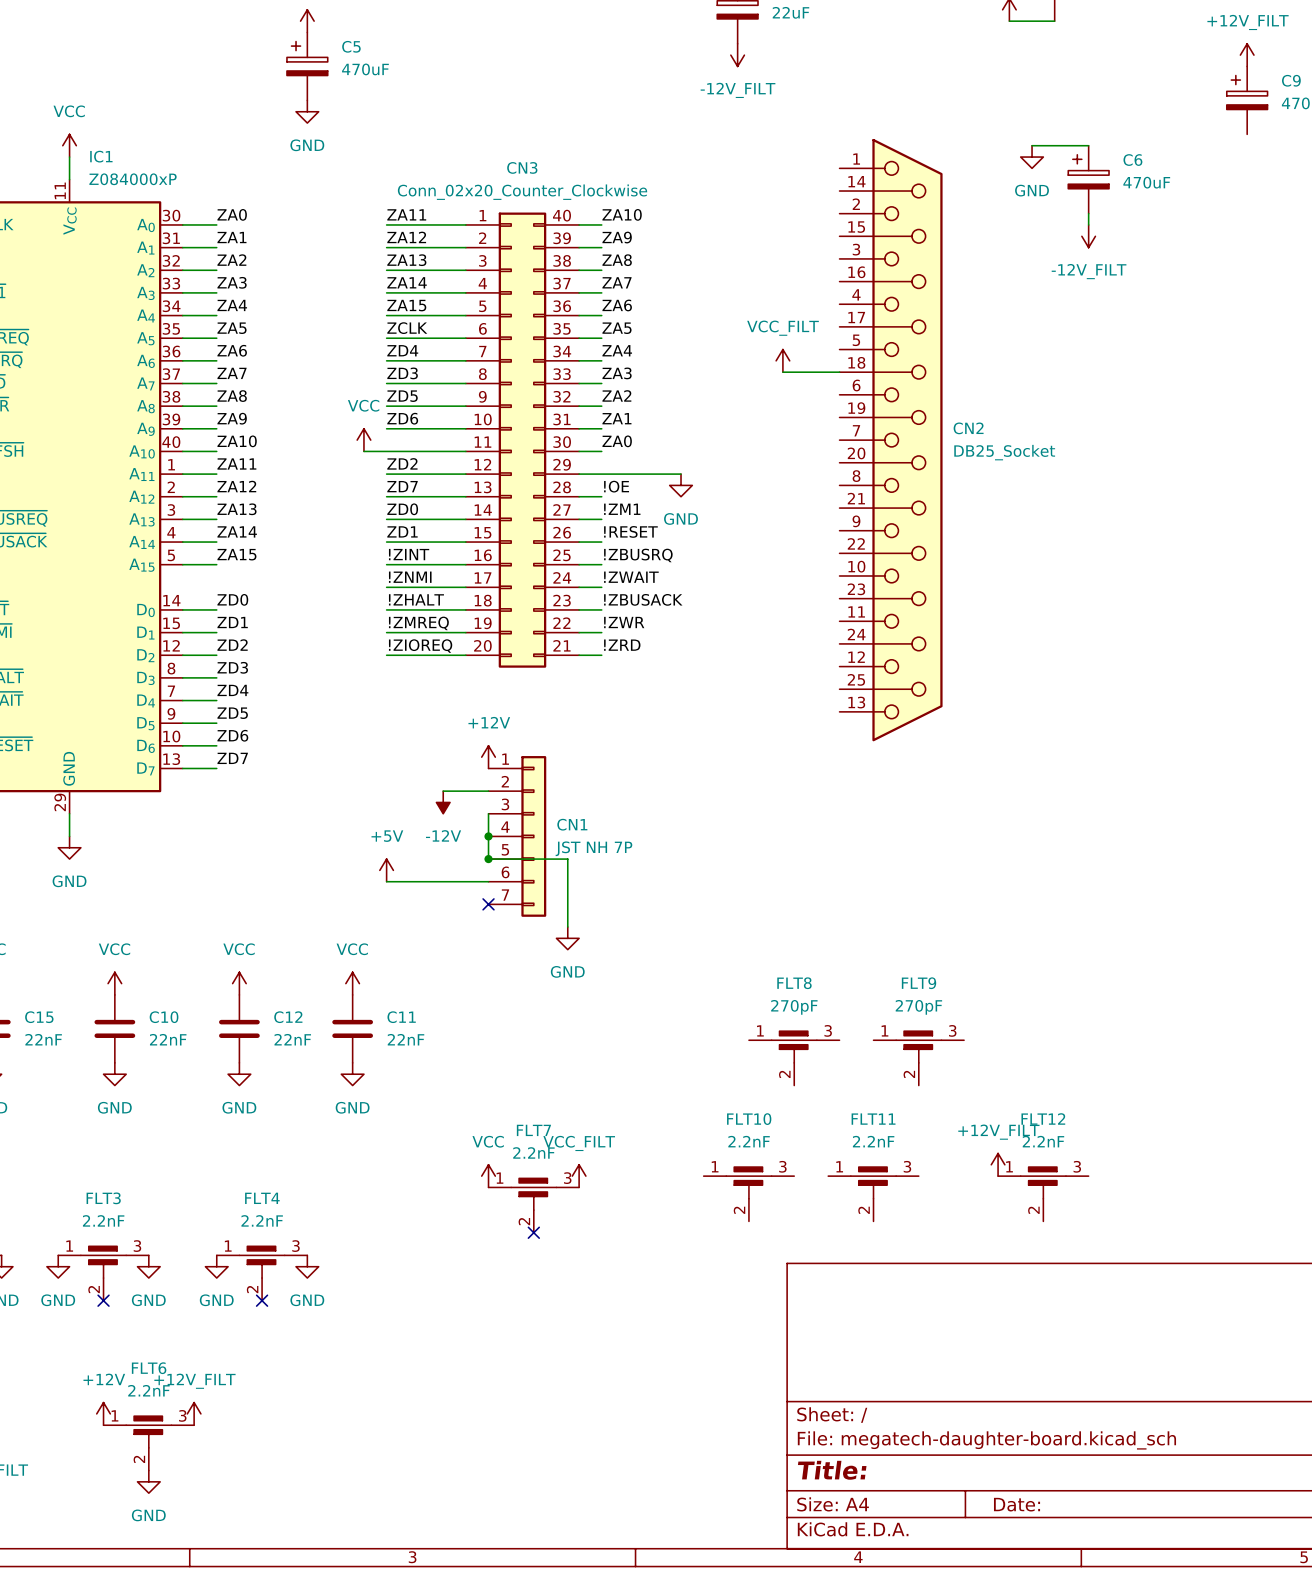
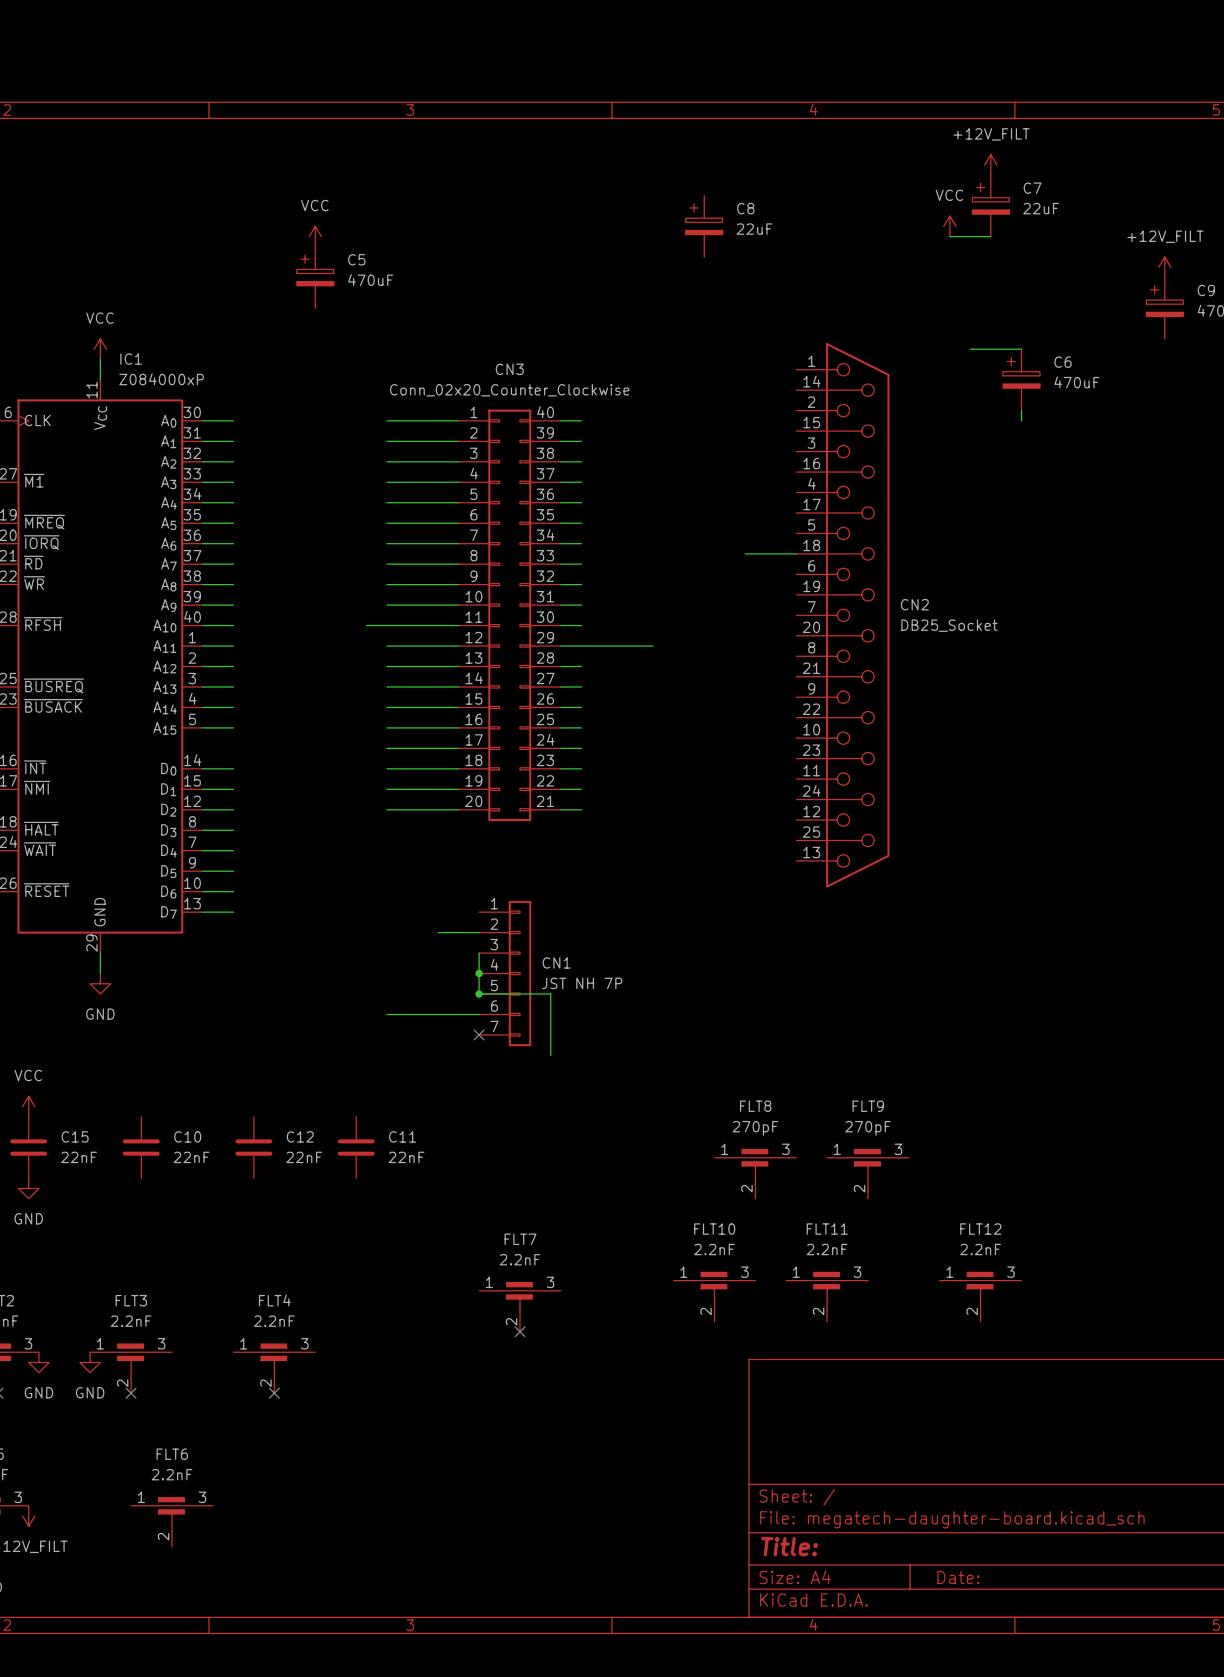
power symbol: -12V_FILT (737, 55) -> none
power symbol: GND (307, 111) -> none
power symbol: GND (1032, 157) -> none
label: ZA0 (232, 214) -> none
label: ZA11 (406, 214) -> none
label: ZA10 (622, 214) -> none
power symbol: -12V_FILT (1088, 236) -> none
label: ZA1 (231, 237) -> none
label: ZA12 (406, 237) -> none
label: ZA9 (617, 237) -> none
label: ZA2 (231, 260) -> none
label: ZA13 (406, 260) -> none
label: ZA8 (617, 260) -> none
label: ZA3 (232, 282) -> none
label: ZA14 (407, 282) -> none
label: ZA7 (617, 282) -> none
label: ZA4 (232, 305) -> none
label: ZA15 (406, 305) -> none
label: ZA6 (617, 305) -> none
label: ZA5 (232, 328) -> none
label: ZCLK (407, 328) -> none
label: ZA5 (616, 328) -> none
label: ZA6 (232, 350) -> none
label: ZD4 (402, 350) -> none
label: ZA4 (617, 350) -> none
power symbol: VCC_FILT (782, 360) -> none
label: ZA7 (232, 373) -> none
label: ZD3 (402, 373) -> none
label: ZA3 (617, 373) -> none
label: ZA2 (616, 395) -> none
label: ZA8 (232, 396) -> none
label: ZD5 (402, 396) -> none
label: ZA9 (232, 418) -> none
label: ZD6 (402, 418) -> none
label: ZA1 (616, 418) -> none
power symbol: VCC (363, 440) -> none
label: ZA10 (237, 441) -> none
label: ZA0 (617, 441) -> none
label: ZA11 (236, 463) -> none
label: ZD2 (402, 463) -> none
power symbol: GND (681, 485) -> none
label: ZA12 (236, 486) -> none
label: ZD7 (402, 486) -> none
label: !OE (616, 486) -> none
label: ZA13 (237, 509) -> none
label: ZD0 (402, 509) -> none
label: !ZM1 (622, 509) -> none
label: ZA14 (237, 531) -> none
label: ZD1 (402, 531) -> none
label: !RESET (630, 531) -> none
label: ZA15 (236, 554) -> none
label: !ZINT (409, 554) -> none
label: !ZBUSRQ (638, 555) -> none
label: !ZNMI (410, 577) -> none
label: !ZWAIT (631, 577) -> none
label: ZD0 (232, 599) -> none
label: !ZHALT (416, 599) -> none
label: !ZBUSACK (643, 599) -> none
label: ZD1 (232, 622) -> none
label: !ZWR (624, 622) -> none
label: !ZMREQ (418, 623) -> none
label: ZD2 (232, 645) -> none
label: !ZRD (622, 645) -> none
label: !ZIOREQ (420, 646) -> none
label: ZD3 (232, 667) -> none
label: ZD4 (232, 690) -> none
label: ZD5 (232, 713) -> none
label: ZD6 (232, 735) -> none
power symbol: +12V (488, 757) -> none
label: ZD7 (232, 758) -> none
power symbol: -12V (443, 802) -> none
power symbol: +5V (386, 870) -> none
power symbol: GND (567, 938) -> none
power symbol: VCC (114, 983) -> none
power symbol: VCC (239, 983) -> none
power symbol: VCC (352, 983) -> none
power symbol: GND (114, 1074) -> none
power symbol: GND (239, 1074) -> none
power symbol: GND (352, 1074) -> none
power symbol: +12V_FILT (998, 1164) -> none
power symbol: VCC (488, 1176) -> none
power symbol: VCC_FILT (579, 1176) -> none
power symbol: GND (148, 1266) -> none
power symbol: GND (216, 1266) -> none
power symbol: GND (307, 1266) -> none
power symbol: +12V (103, 1413) -> none
power symbol: +12V_FILT (194, 1413) -> none
power symbol: GND (148, 1481) -> none

